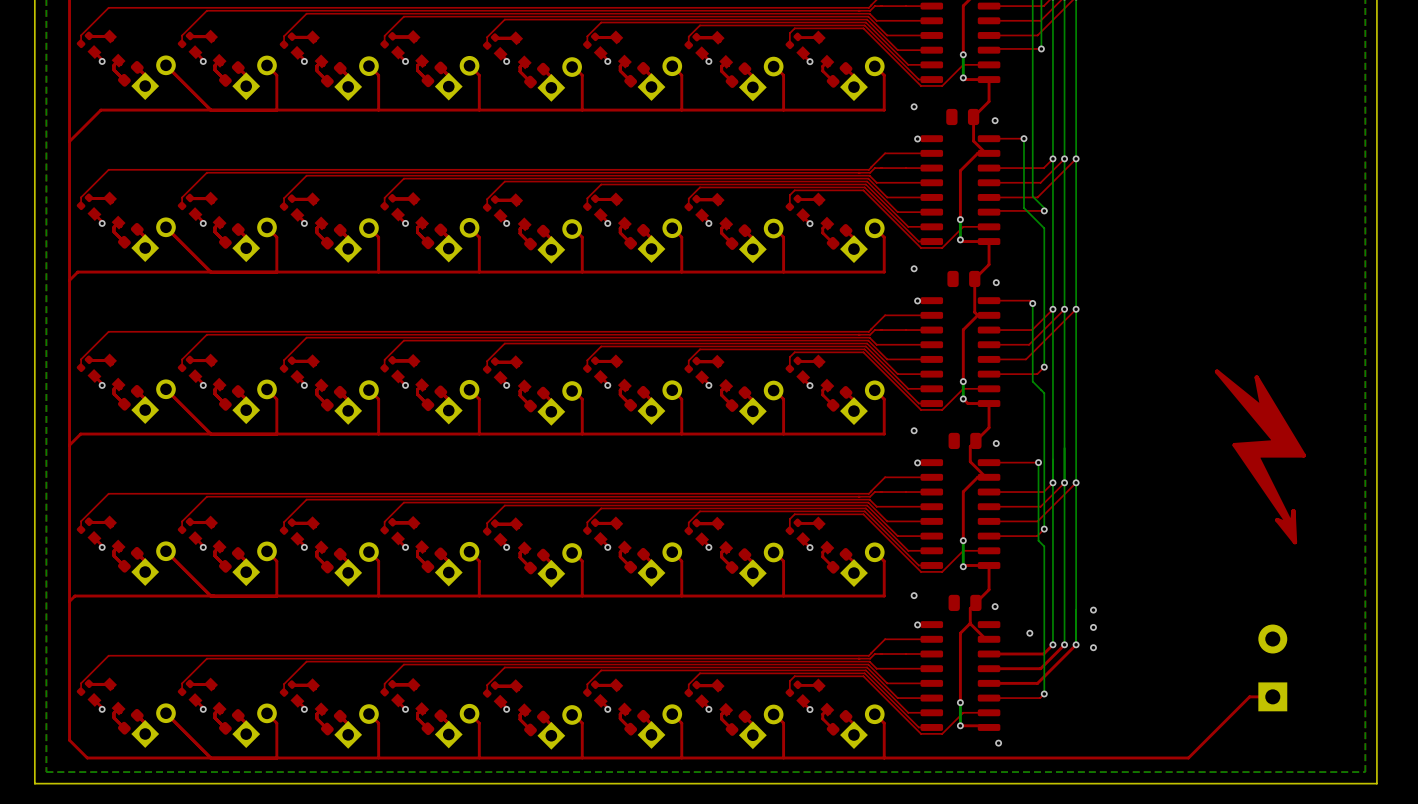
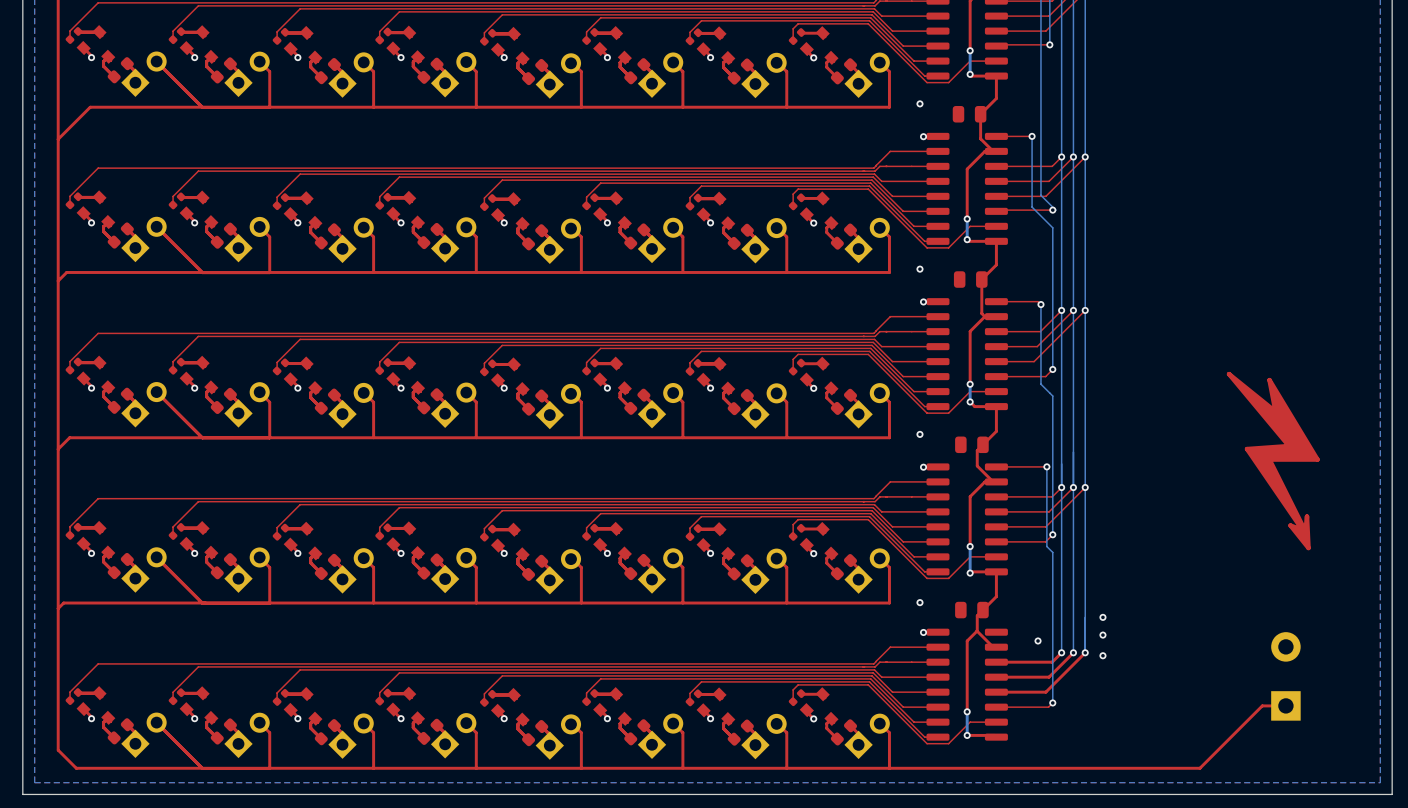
via: (995, 120) -> none
via: (996, 282) -> none
via: (996, 443) -> none
via: (995, 606) -> none
via: (998, 743) -> none

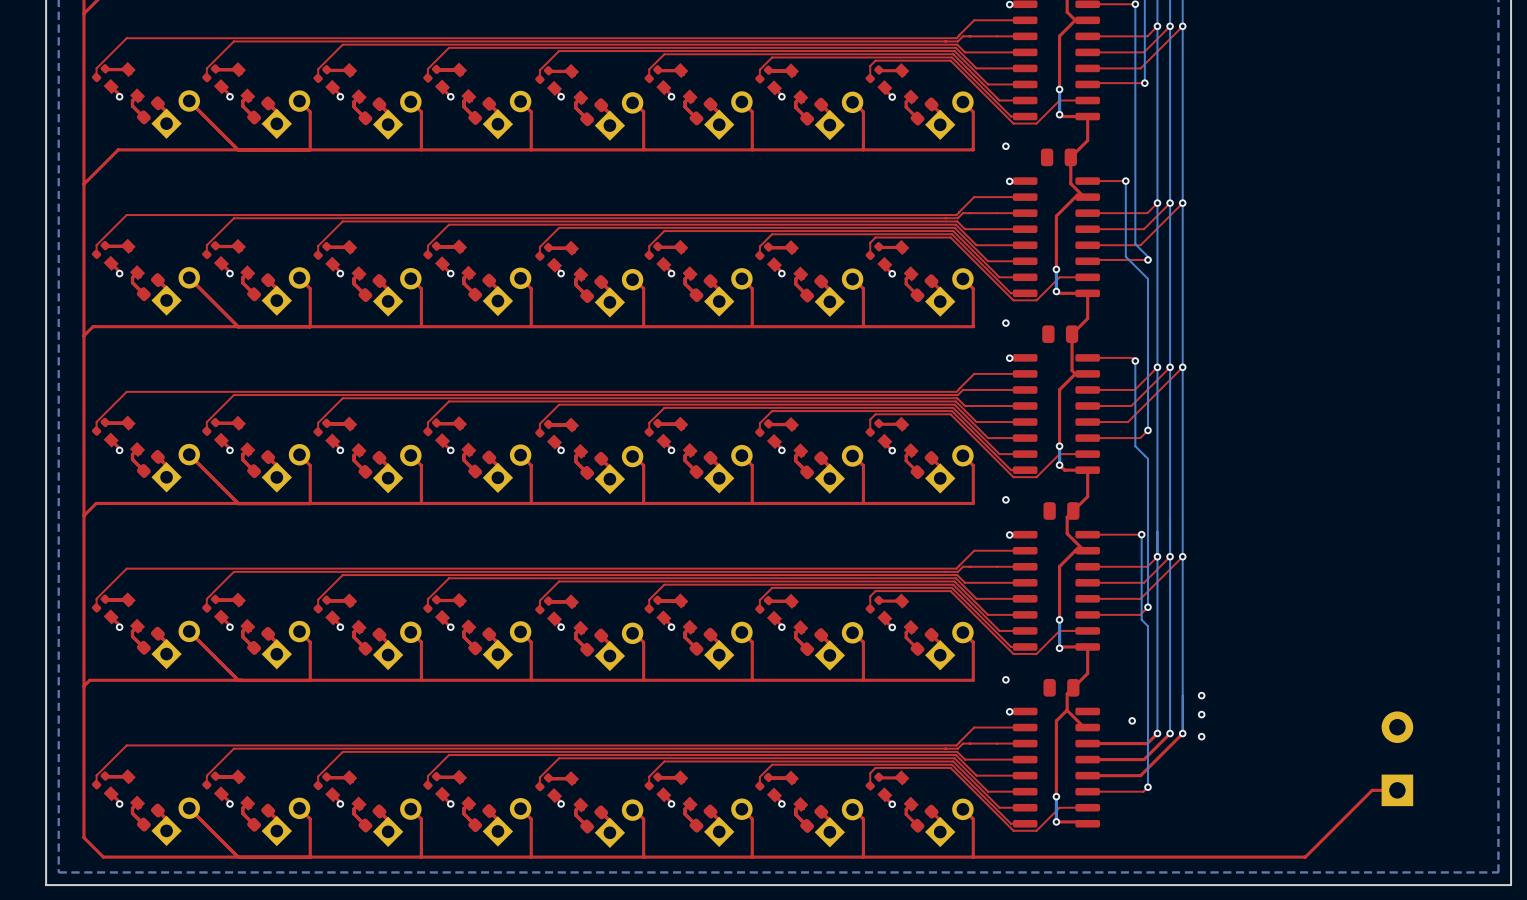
drawing: [1226, 371, 1320, 551] -> none

